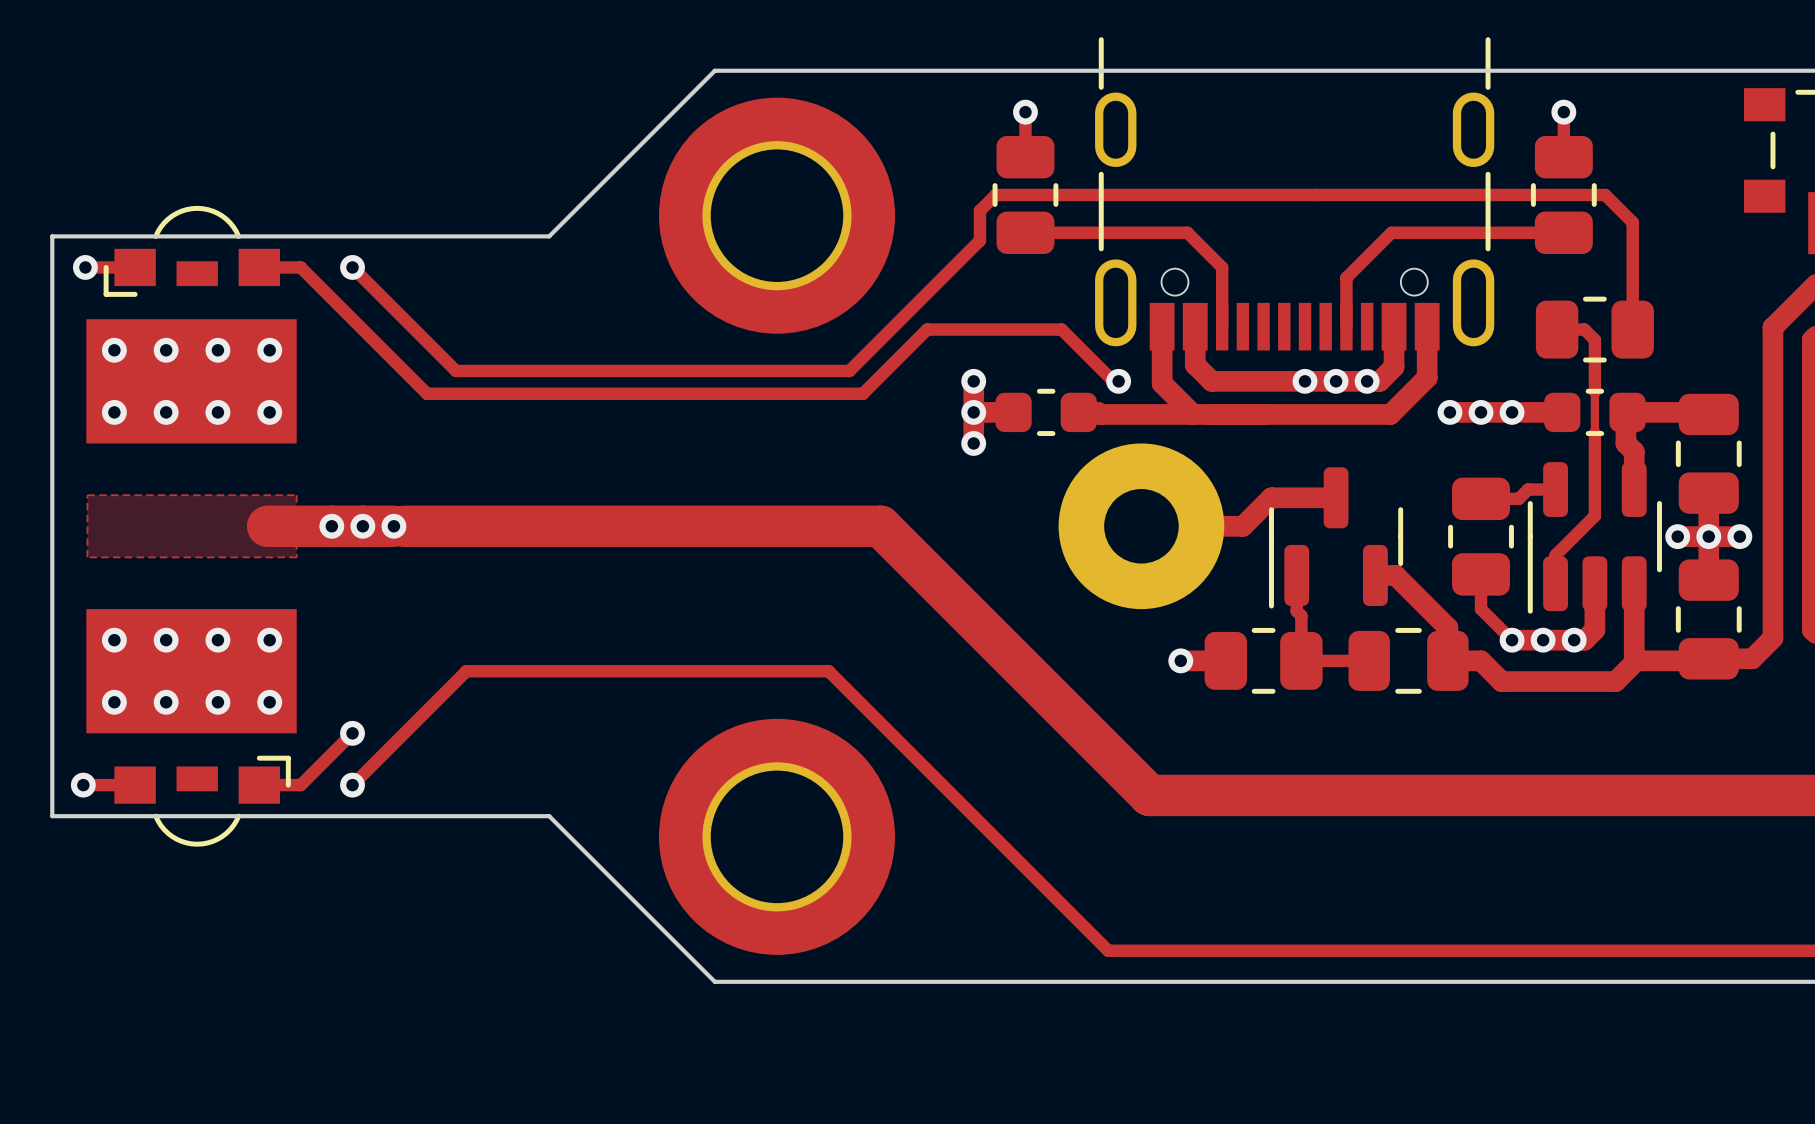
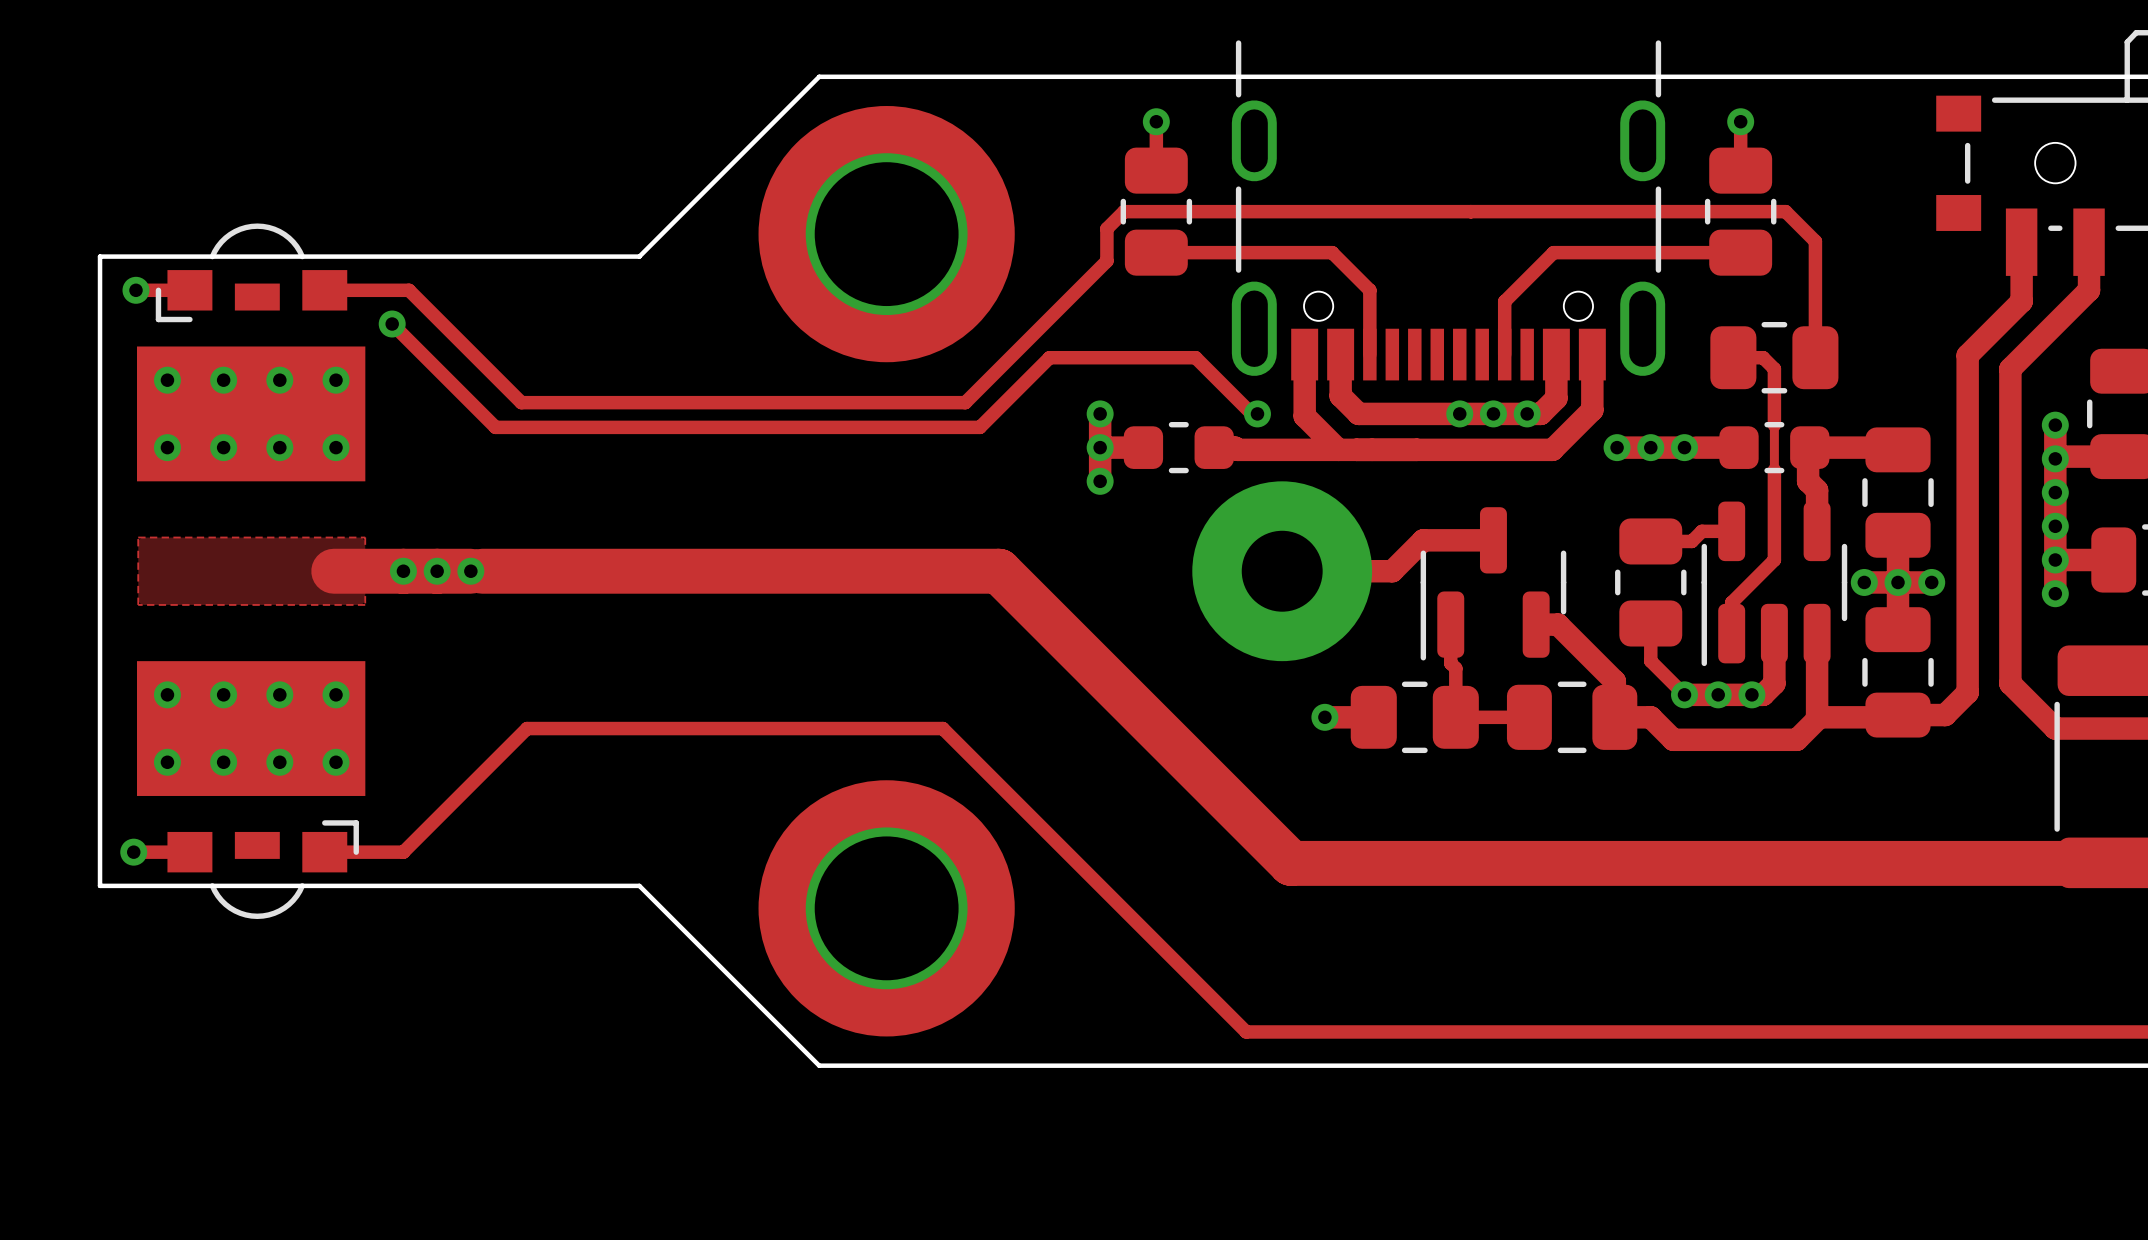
track: (300, 267) (427, 393) -> (369, 290) (409, 290) (521, 402) (538, 402)
track: (352, 267) (456, 370) -> none
via position: (352, 267) -> (392, 324)
track: none -> (392, 324) (495, 427) (506, 427)
track: (466, 671) (352, 785) -> (549, 728) (527, 728) (403, 852) (369, 852)
track: (352, 733) (300, 785) -> none
via: (352, 733) -> none
via: (352, 785) -> none

